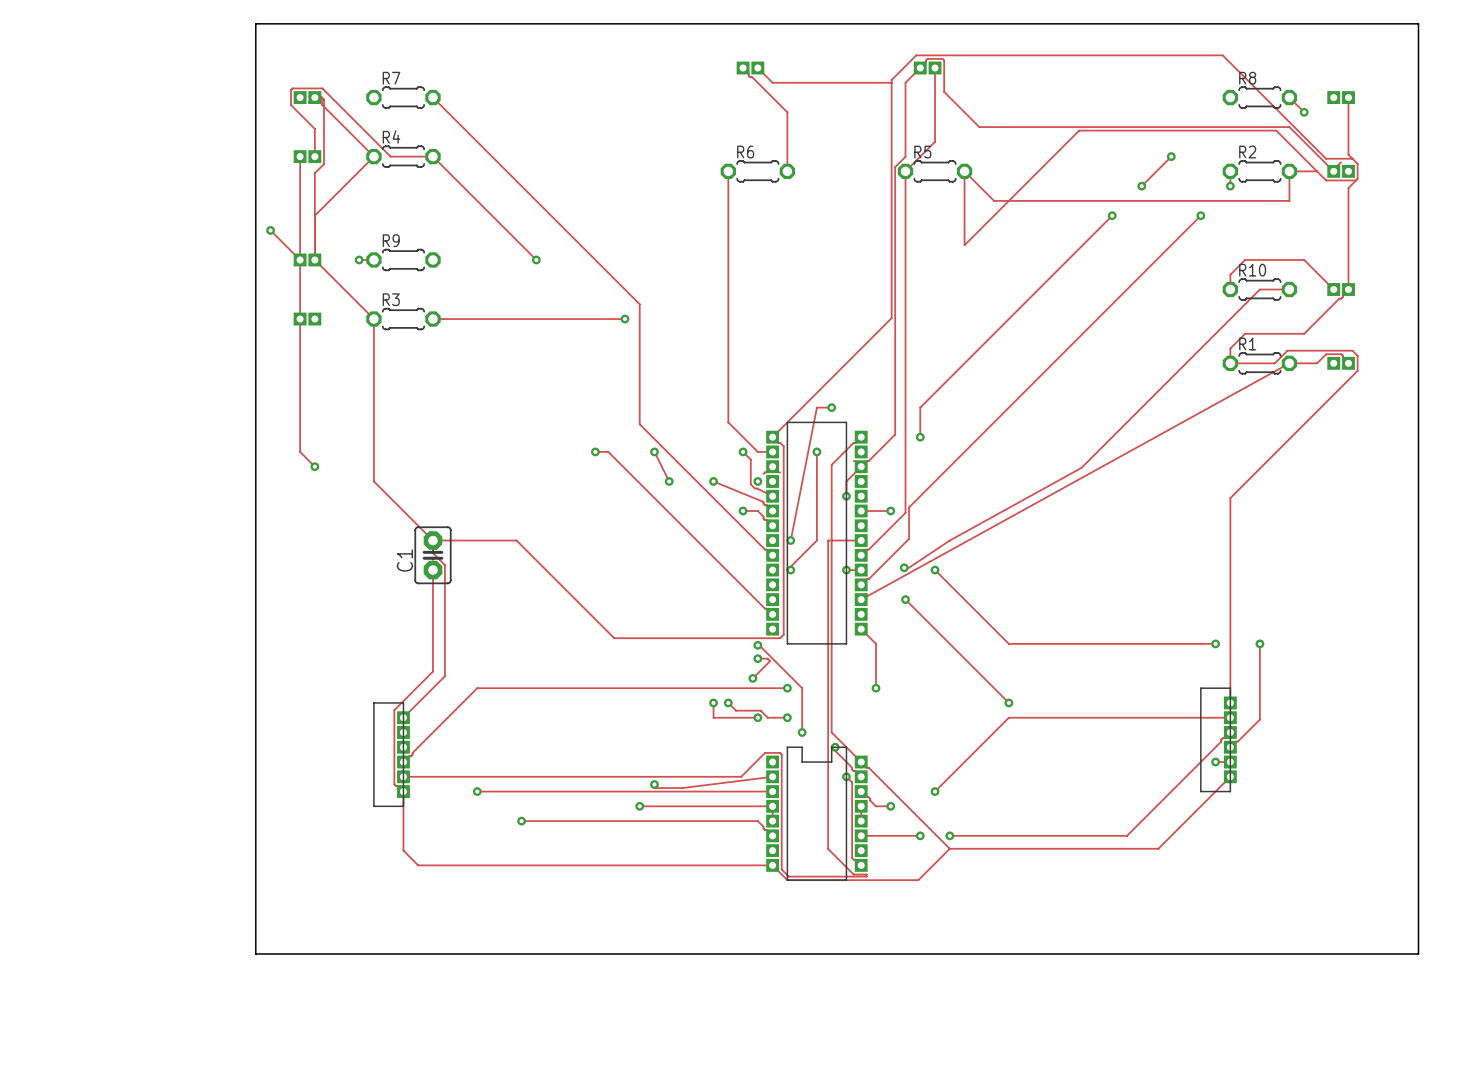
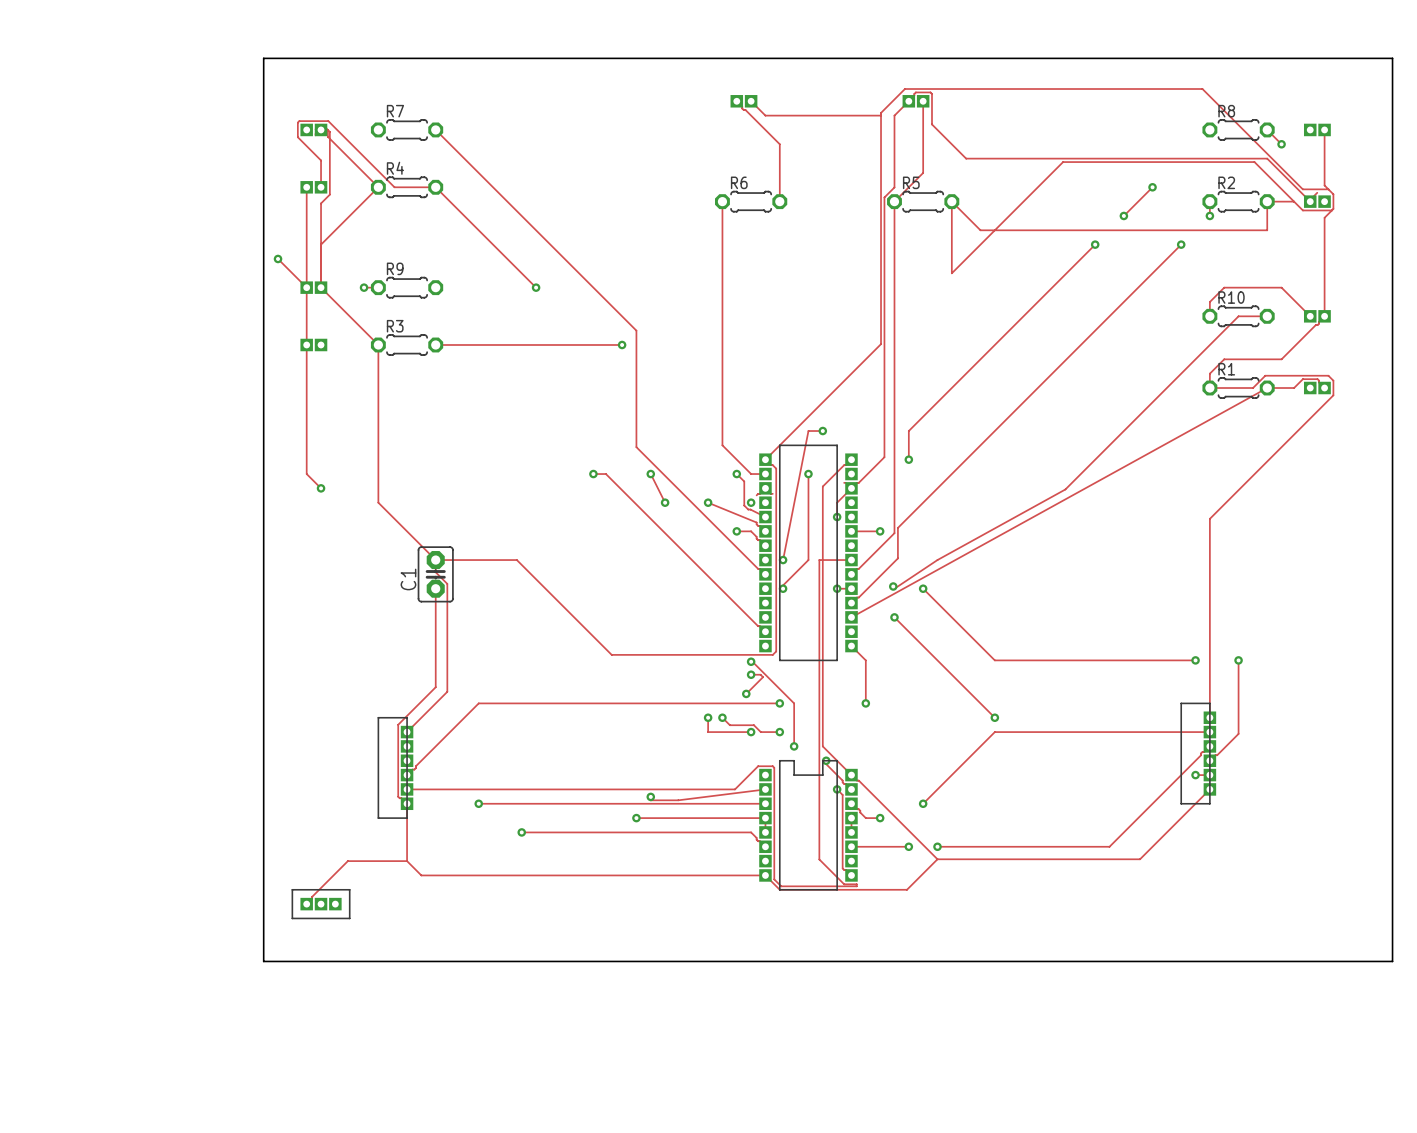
track: none -> (407, 861) (347, 861) (306, 904)
part: none -> (321, 904)

